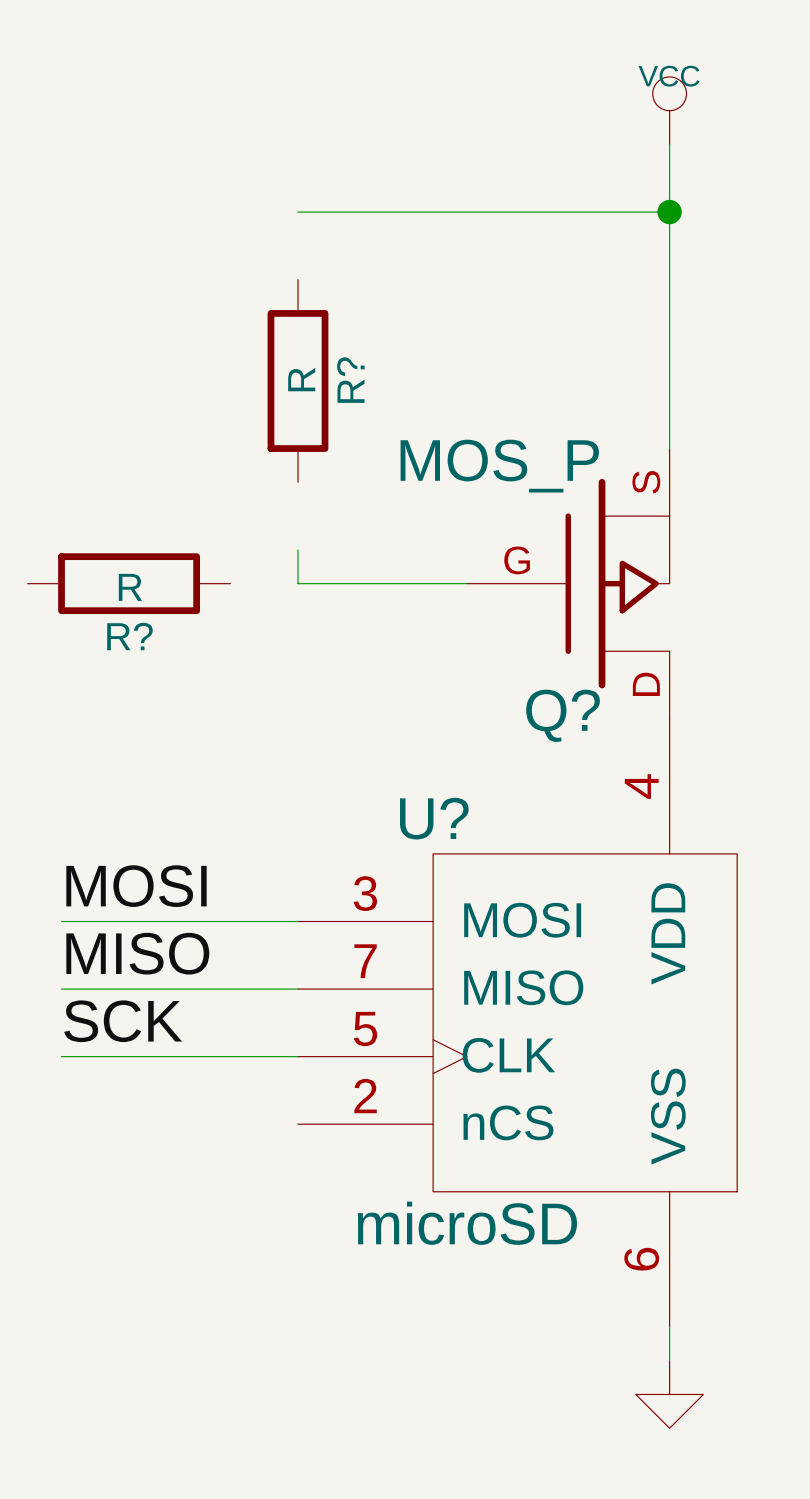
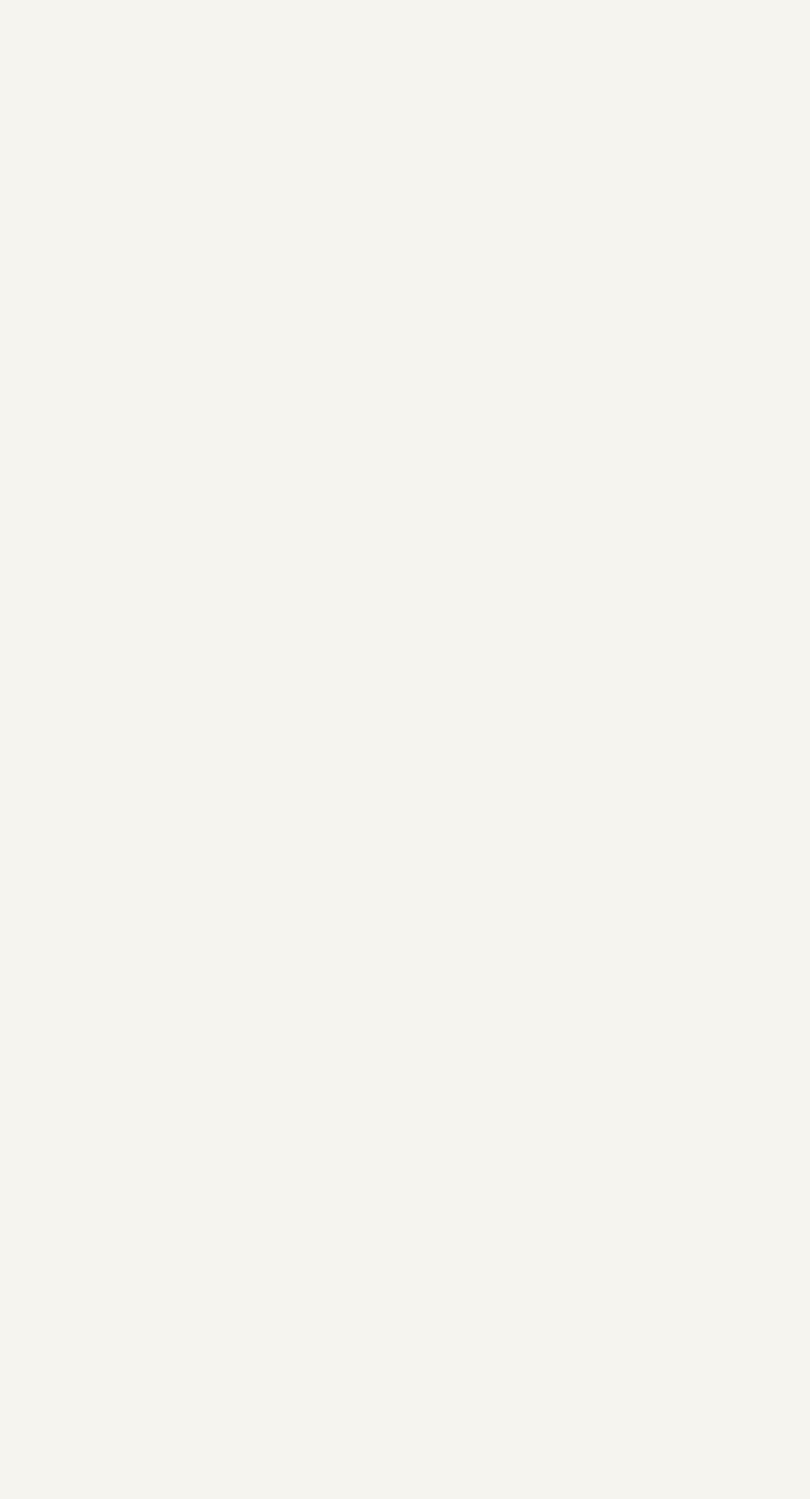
power symbol: VCC (669, 110) -> none
wire: (669, 144) (669, 448) -> none
wire: (297, 212) (669, 212) -> none
junction: (669, 212) -> none
R?: R (297, 380) -> none
wire: (297, 549) (297, 583) (466, 583) -> none
R?: R (129, 583) -> none
Q?: MOS_P (568, 583) -> none
label: MOSI (136, 886) -> none
wire: (61, 921) (297, 921) -> none
label: MISO (137, 953) -> none
wire: (61, 989) (297, 989) -> none
label: SCK (123, 1021) -> none
U?: microSD (517, 1022) -> none
wire: (61, 1056) (297, 1056) -> none
wire: (669, 1326) (669, 1360) -> none
power symbol: (669, 1394) -> none

